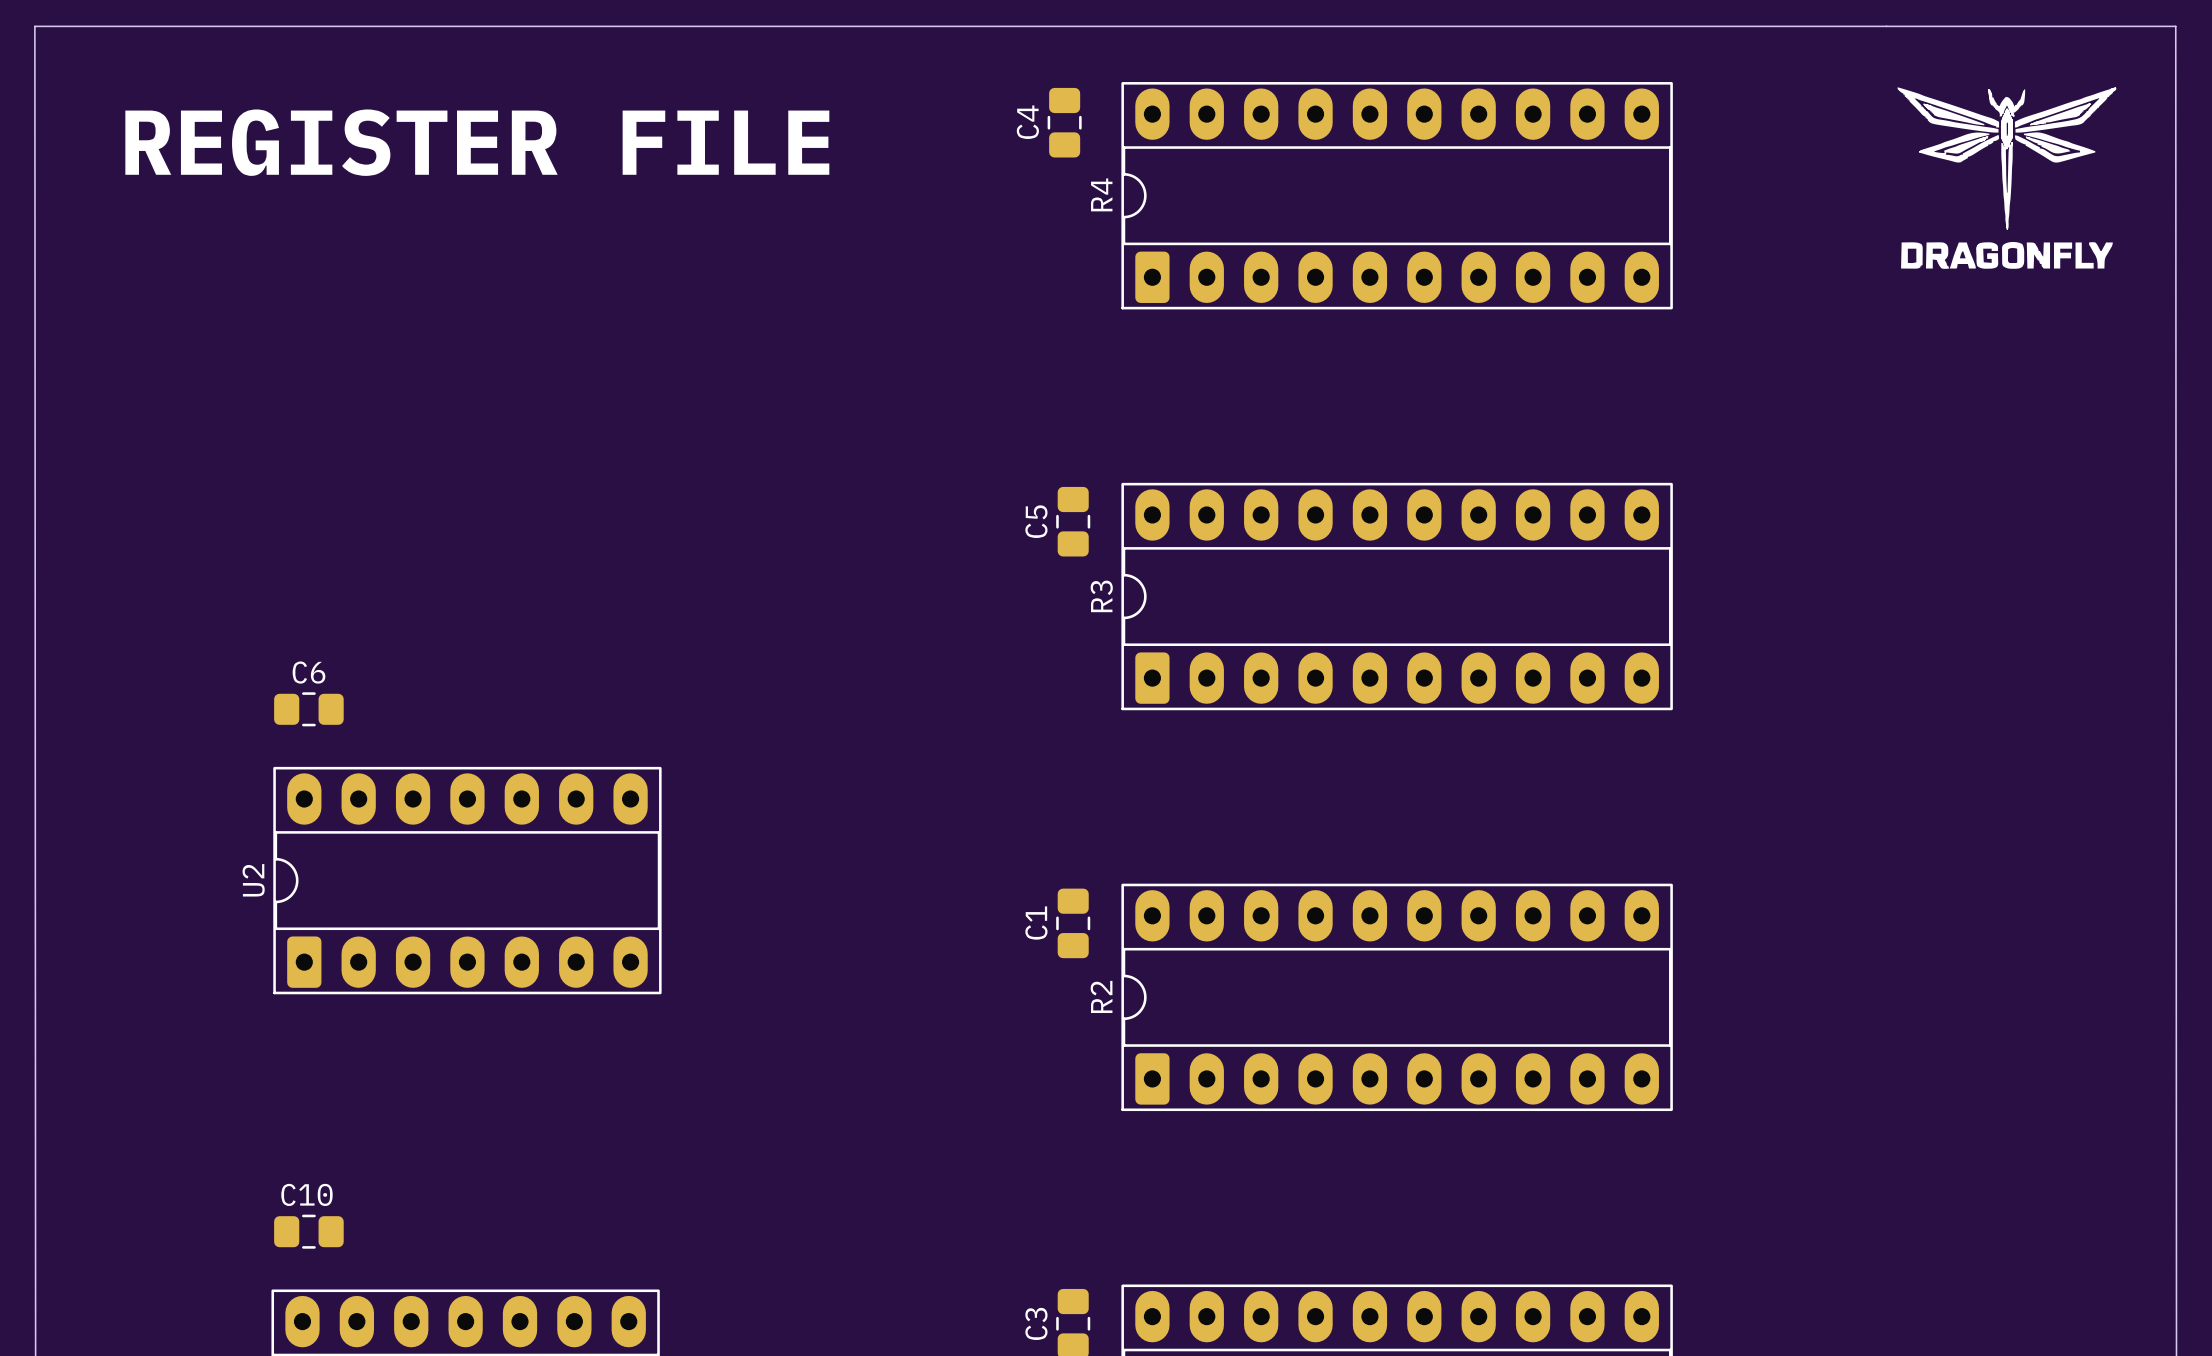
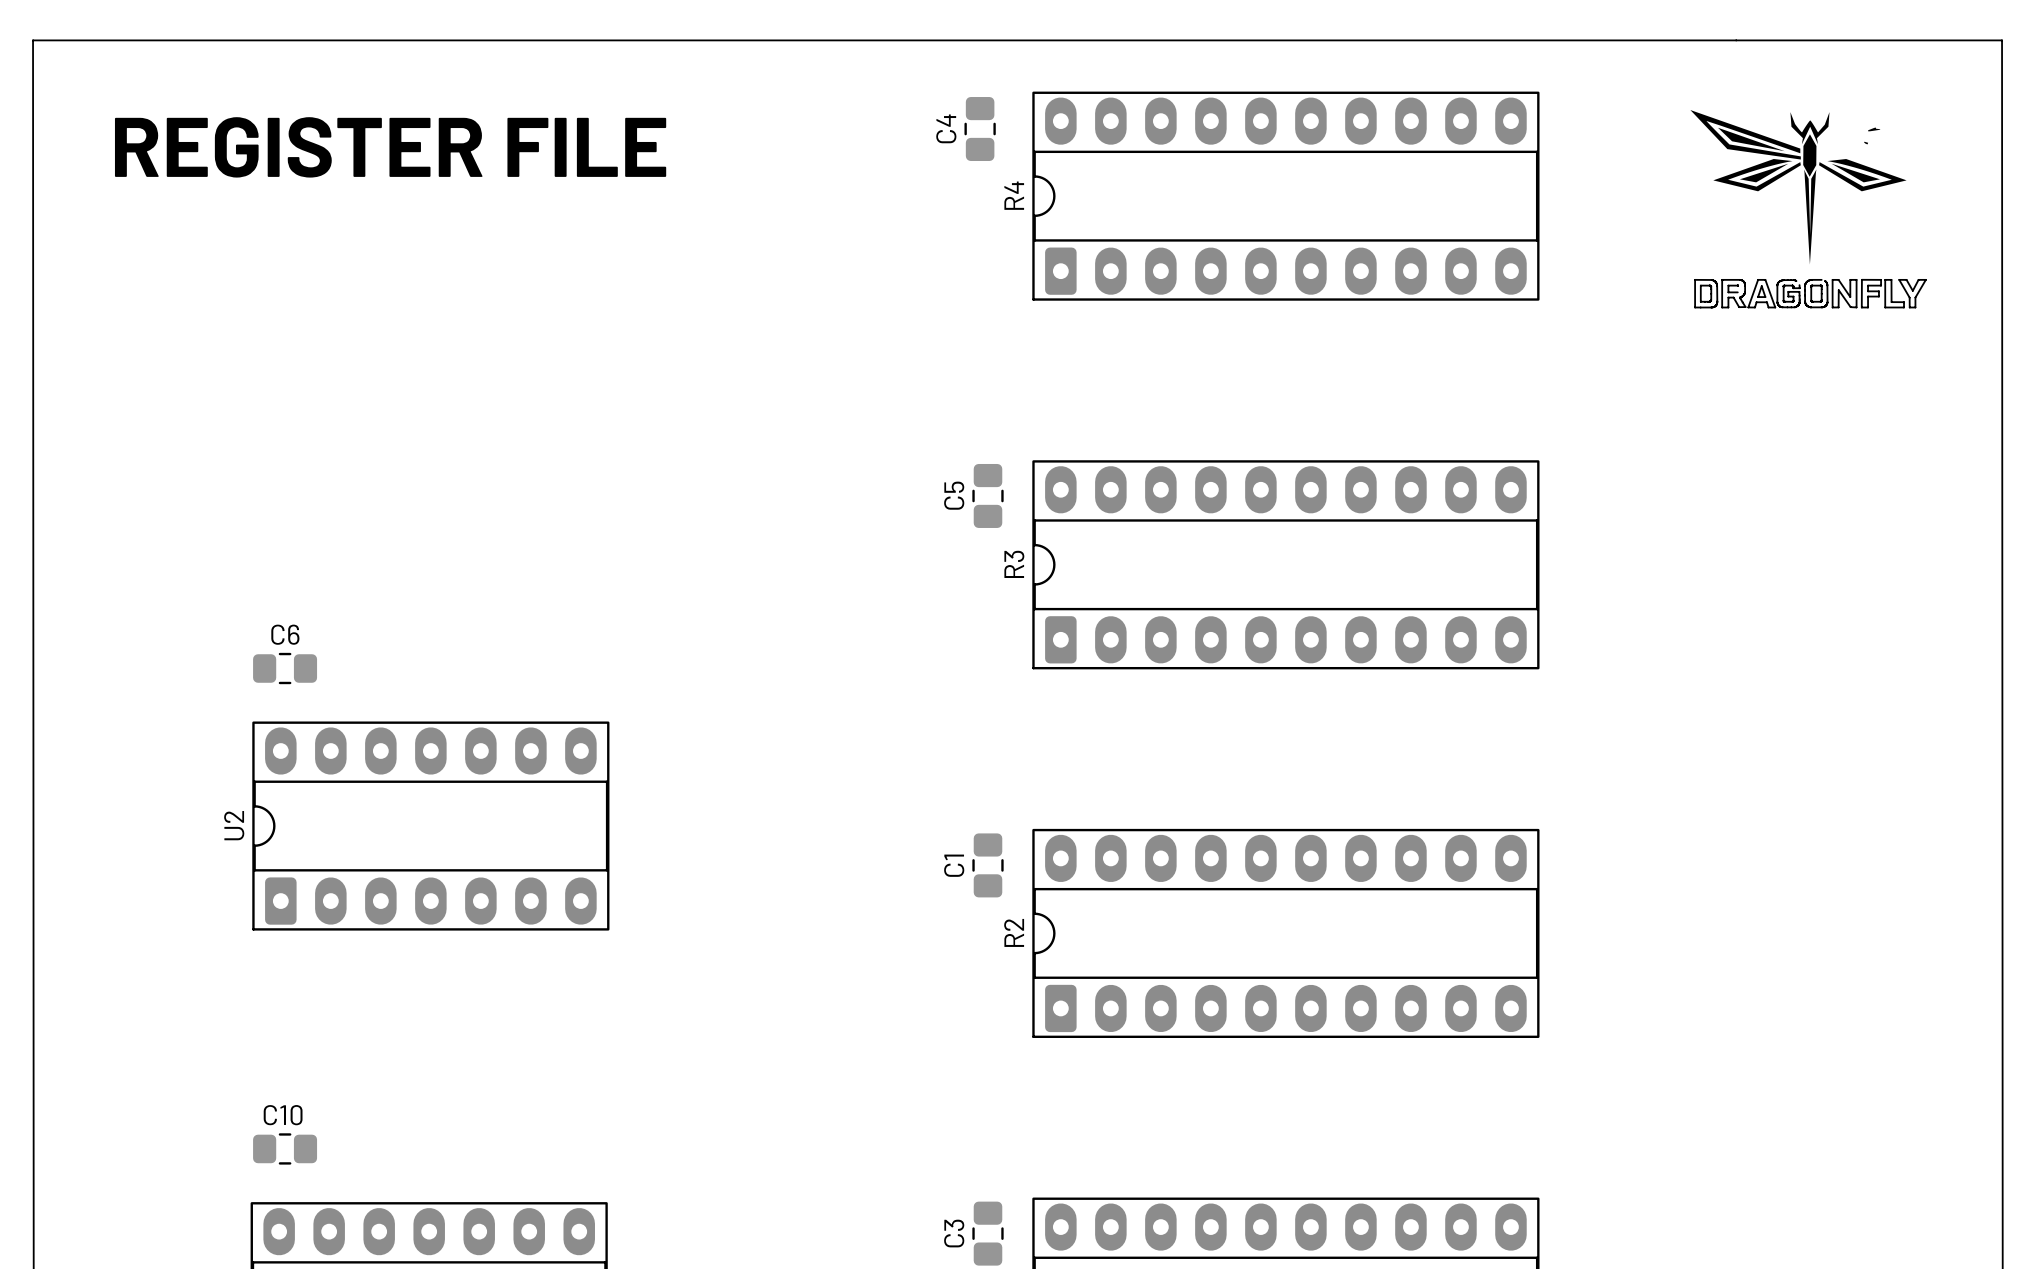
drawing: [1897, 87, 2117, 269] -> none
drawing: none -> [1690, 110, 1907, 265]
line: none -> (1739, 279) (1722, 279) (1722, 307) (1728, 307) (1728, 297) (1733, 297) (1739, 307) (1745, 307) (1741, 297)
line: none -> (1758, 279) (1765, 279) (1775, 307) (1768, 307) (1766, 302) (1756, 302) (1754, 307) (1748, 307) (1758, 279)
line: none -> (1793, 280) (1784, 280)
line: none -> (1821, 279) (1807, 281)
line: none -> (1832, 279) (1832, 307) (1838, 307) (1838, 290) (1850, 307) (1856, 307) (1856, 279) (1850, 279) (1850, 297) (1838, 279) (1832, 279)
line: none -> (1861, 279) (1861, 307) (1868, 307) (1868, 296) (1878, 296) (1878, 291) (1868, 291) (1868, 285) (1881, 285) (1881, 279) (1861, 279)
line: none -> (1885, 279) (1885, 307) (1903, 307) (1904, 302) (1891, 302) (1891, 279) (1885, 279)
line: none -> (1899, 279) (1906, 279) (1912, 290) (1918, 279) (1925, 279) (1915, 297) (1915, 307) (1909, 307) (1909, 297) (1899, 279)
line: none -> (1713, 280) (1695, 279) (1695, 307) (1714, 306)
line: none -> (1783, 280) (1780, 280)
line: none -> (1716, 283) (1717, 301)
line: none -> (1744, 283) (1745, 292)
line: none -> (1777, 283) (1777, 302)
line: none -> (1827, 283) (1827, 302)
line: none -> (1709, 285) (1700, 285) (1700, 301) (1709, 301)
line: none -> (1737, 285) (1728, 285) (1728, 292) (1737, 292)
line: none -> (1784, 285) (1792, 285)
line: none -> (1799, 285) (1799, 288) (1793, 287)
line: none -> (1805, 285) (1805, 303)
line: none -> (1812, 285) (1820, 285)
line: none -> (1761, 286) (1758, 297) (1765, 297) (1761, 286)
line: none -> (1711, 286) (1711, 300)
line: none -> (1783, 286) (1783, 300)
line: none -> (1811, 287) (1811, 300)
line: none -> (1821, 286) (1821, 300)
line: none -> (1744, 293) (1744, 294)
line: none -> (1793, 300) (1793, 296) (1788, 296) (1788, 291) (1799, 291) (1799, 302)
line: none -> (1785, 301) (1792, 301)
line: none -> (1812, 301) (1820, 301)
line: none -> (1717, 302) (1717, 303)
line: none -> (1827, 303) (1826, 304)
line: none -> (1777, 303) (1777, 304)
line: none -> (1797, 306) (1796, 306)
line: none -> (1808, 306) (1810, 307)
line: none -> (1781, 307) (1794, 307)
line: none -> (1823, 307) (1811, 307)

